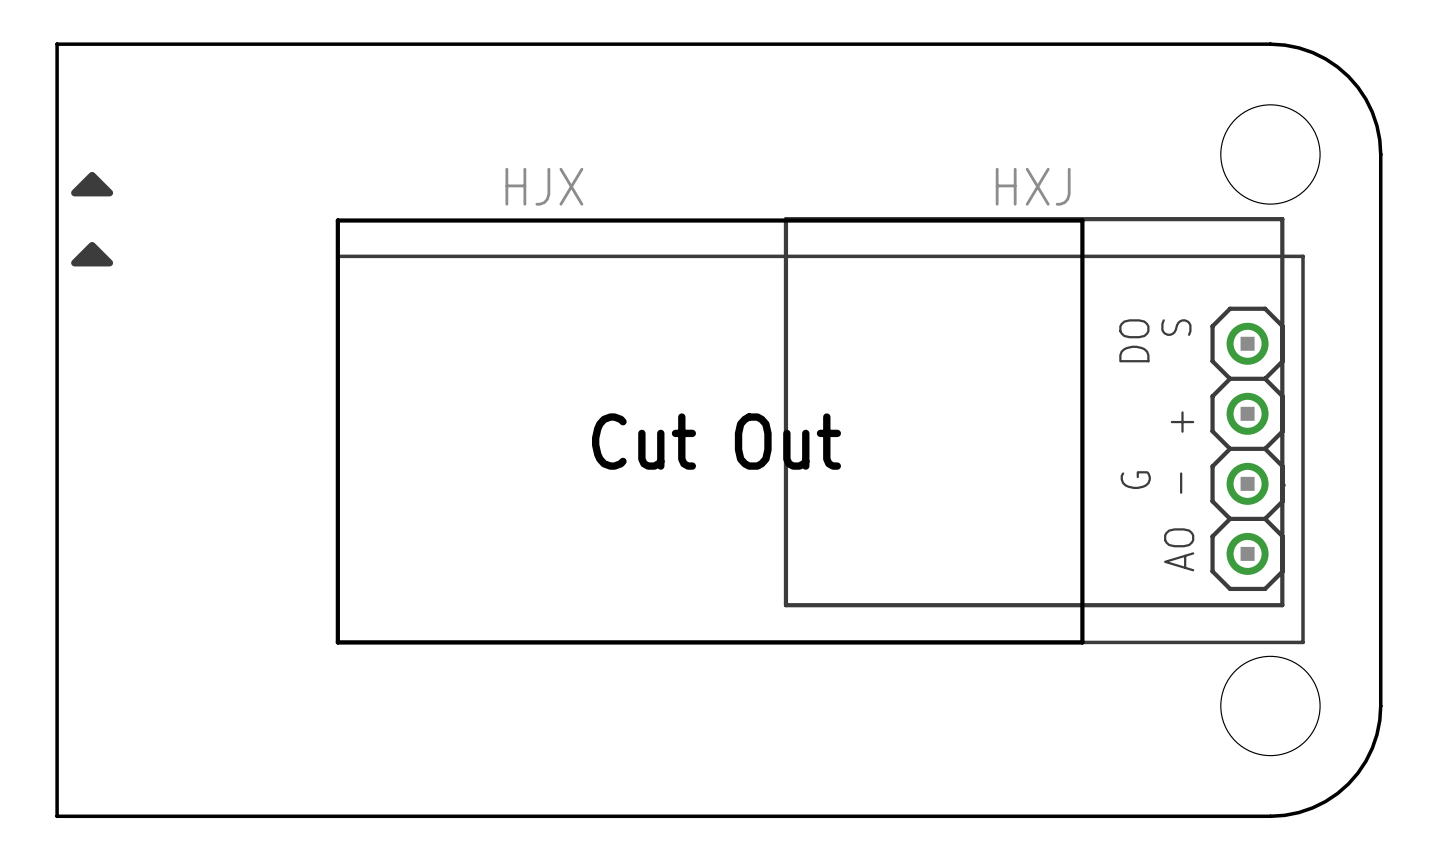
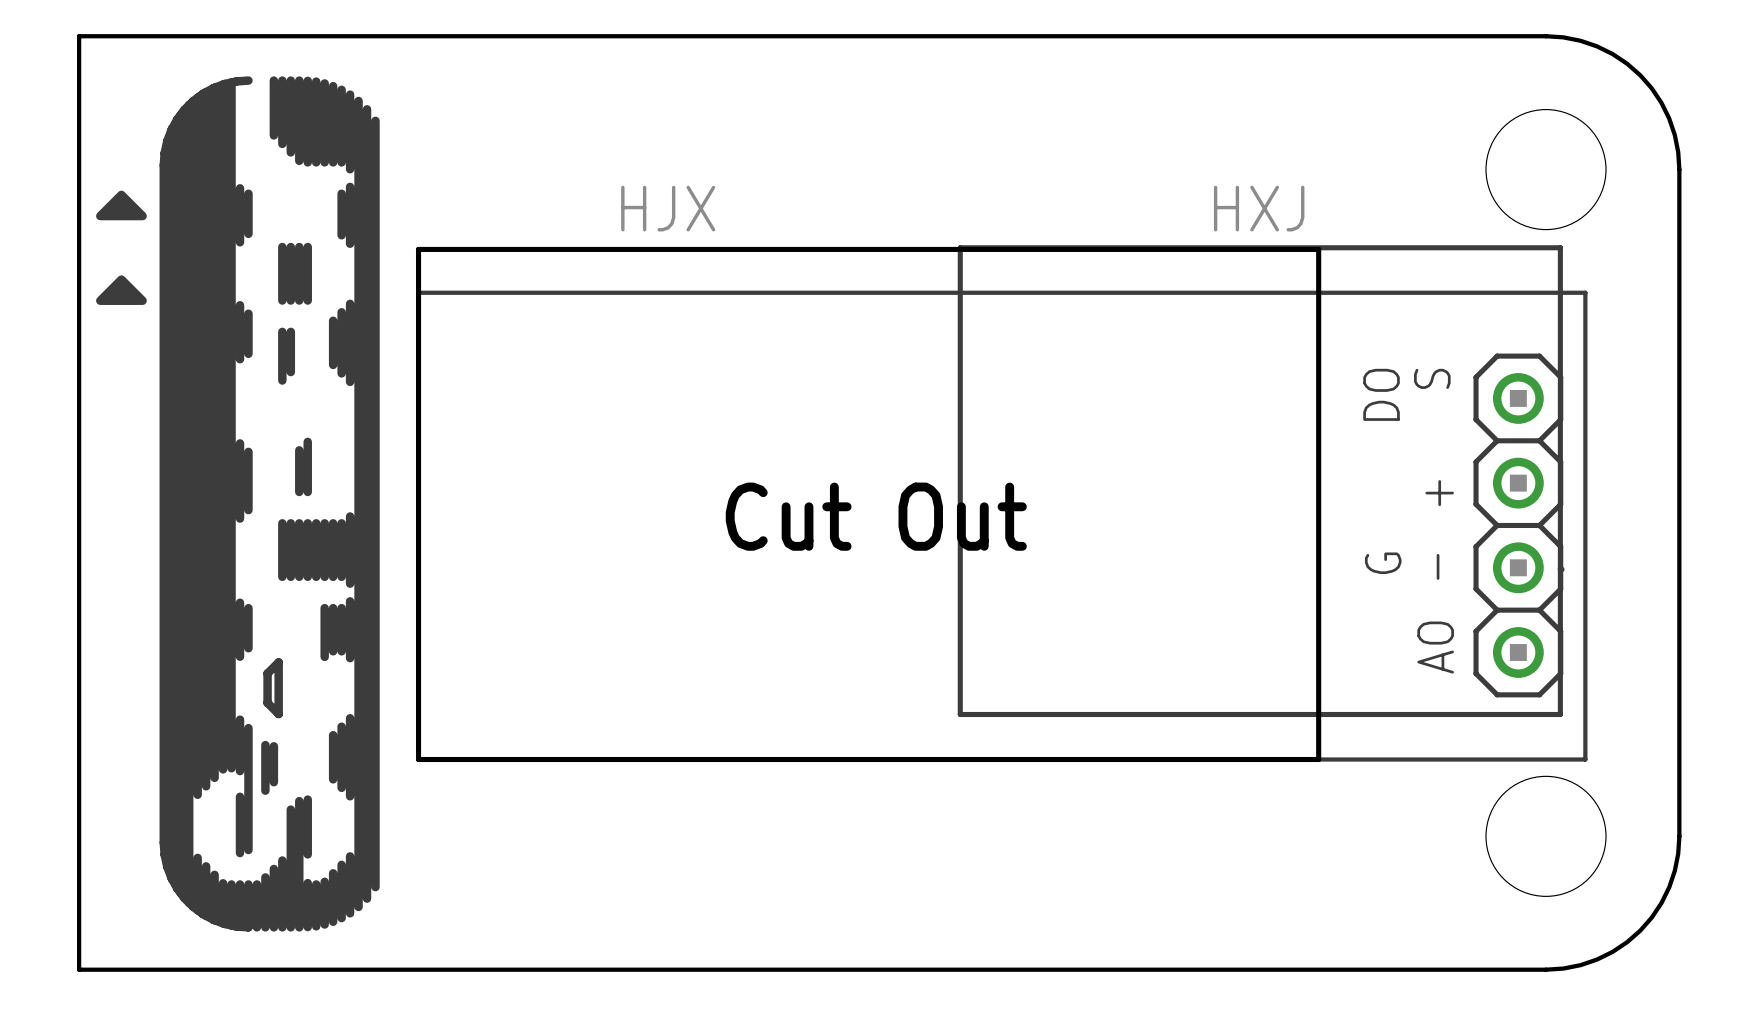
line: none -> (248, 80) (224, 84) (213, 88) (193, 101) (184, 109) (171, 130) (167, 141) (163, 165) (164, 854) (171, 877) (184, 898) (202, 913) (224, 923) (248, 927) (248, 884)
line: none -> (273, 80) (273, 135)
line: none -> (282, 80) (282, 143)
line: none -> (290, 80) (290, 152)
line: none -> (299, 80) (299, 160)
line: none -> (307, 80) (307, 162)
line: none -> (316, 81) (316, 162)
line: none -> (231, 82) (231, 768)
line: none -> (324, 83) (324, 162)
line: none -> (223, 84) (223, 769)
line: none -> (333, 86) (333, 162)
line: none -> (214, 87) (214, 777)
line: none -> (341, 89) (341, 162)
line: none -> (206, 92) (206, 786)
line: none -> (350, 94) (350, 169)
line: none -> (197, 97) (197, 794)
line: none -> (358, 100) (358, 906)
line: none -> (189, 105) (189, 902)
line: none -> (367, 109) (367, 898)
line: none -> (180, 114) (180, 893)
line: none -> (375, 120) (375, 887)
line: none -> (172, 128) (172, 879)
line: none -> (350, 186) (350, 243)
line: none -> (240, 188) (240, 242)
line: none -> (248, 193) (248, 233)
line: none -> (341, 193) (341, 235)
line: none -> (282, 247) (282, 300)
line: none -> (290, 247) (290, 300)
line: none -> (299, 247) (299, 300)
line: none -> (307, 247) (307, 300)
line: none -> (350, 303) (350, 381)
line: none -> (240, 305) (240, 359)
line: none -> (341, 312) (341, 373)
line: none -> (248, 313) (248, 353)
line: none -> (333, 320) (333, 364)
line: none -> (282, 331) (282, 380)
line: none -> (290, 331) (290, 372)
line: none -> (307, 441) (307, 491)
line: none -> (240, 443) (240, 518)
line: none -> (299, 450) (299, 491)
line: none -> (248, 451) (248, 510)
line: none -> (350, 516) (350, 583)
line: none -> (282, 523) (282, 576)
line: none -> (290, 523) (290, 576)
line: none -> (299, 523) (299, 576)
line: none -> (307, 523) (307, 576)
line: none -> (316, 523) (316, 576)
line: none -> (324, 523) (324, 576)
line: none -> (333, 523) (333, 576)
line: none -> (341, 523) (341, 576)
line: none -> (350, 601) (350, 658)
line: none -> (240, 602) (240, 656)
line: none -> (248, 608) (248, 648)
line: none -> (324, 608) (324, 656)
line: none -> (333, 608) (333, 651)
line: none -> (341, 608) (341, 651)
line: none -> (278, 662) (267, 673) (267, 702) (278, 714) (278, 662)
line: none -> (350, 718) (350, 796)
line: none -> (240, 719) (240, 771)
line: none -> (341, 726) (341, 787)
line: none -> (248, 728) (248, 850)
line: none -> (333, 735) (333, 779)
line: none -> (265, 745) (265, 790)
line: none -> (273, 746) (273, 782)
line: none -> (240, 796) (240, 853)
line: none -> (307, 799) (307, 854)
line: none -> (299, 801) (299, 927)
line: none -> (290, 809) (290, 927)
line: none -> (350, 856) (350, 913)
line: none -> (197, 857) (197, 910)
line: none -> (282, 860) (282, 927)
line: none -> (341, 864) (341, 918)
line: none -> (206, 866) (206, 915)
line: none -> (273, 868) (273, 927)
line: none -> (333, 873) (333, 921)
line: none -> (214, 874) (214, 920)
line: none -> (265, 877) (265, 927)
line: none -> (324, 881) (324, 924)
line: none -> (223, 883) (223, 923)
line: none -> (307, 883) (307, 927)
line: none -> (231, 884) (231, 925)
line: none -> (240, 884) (240, 926)
line: none -> (256, 884) (256, 927)
line: none -> (316, 884) (316, 926)

